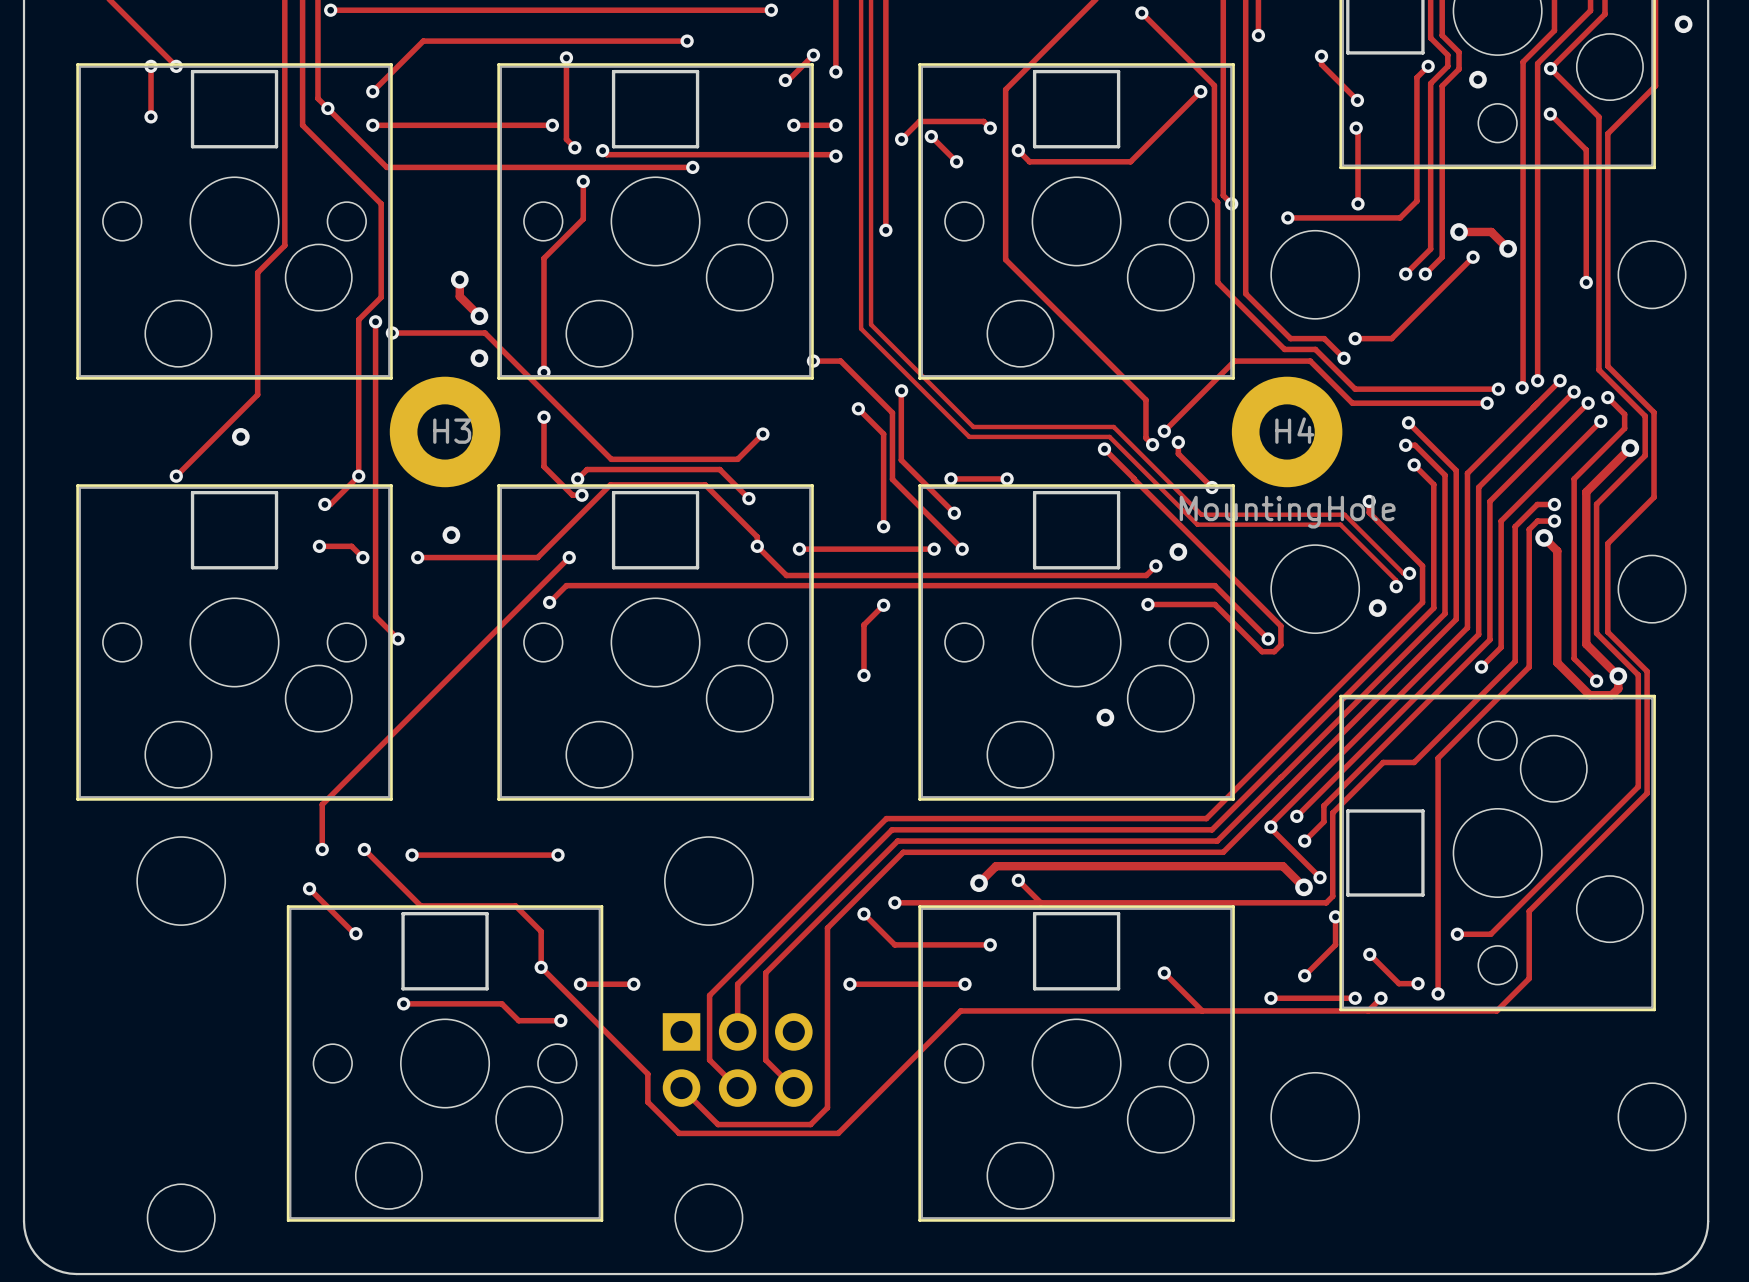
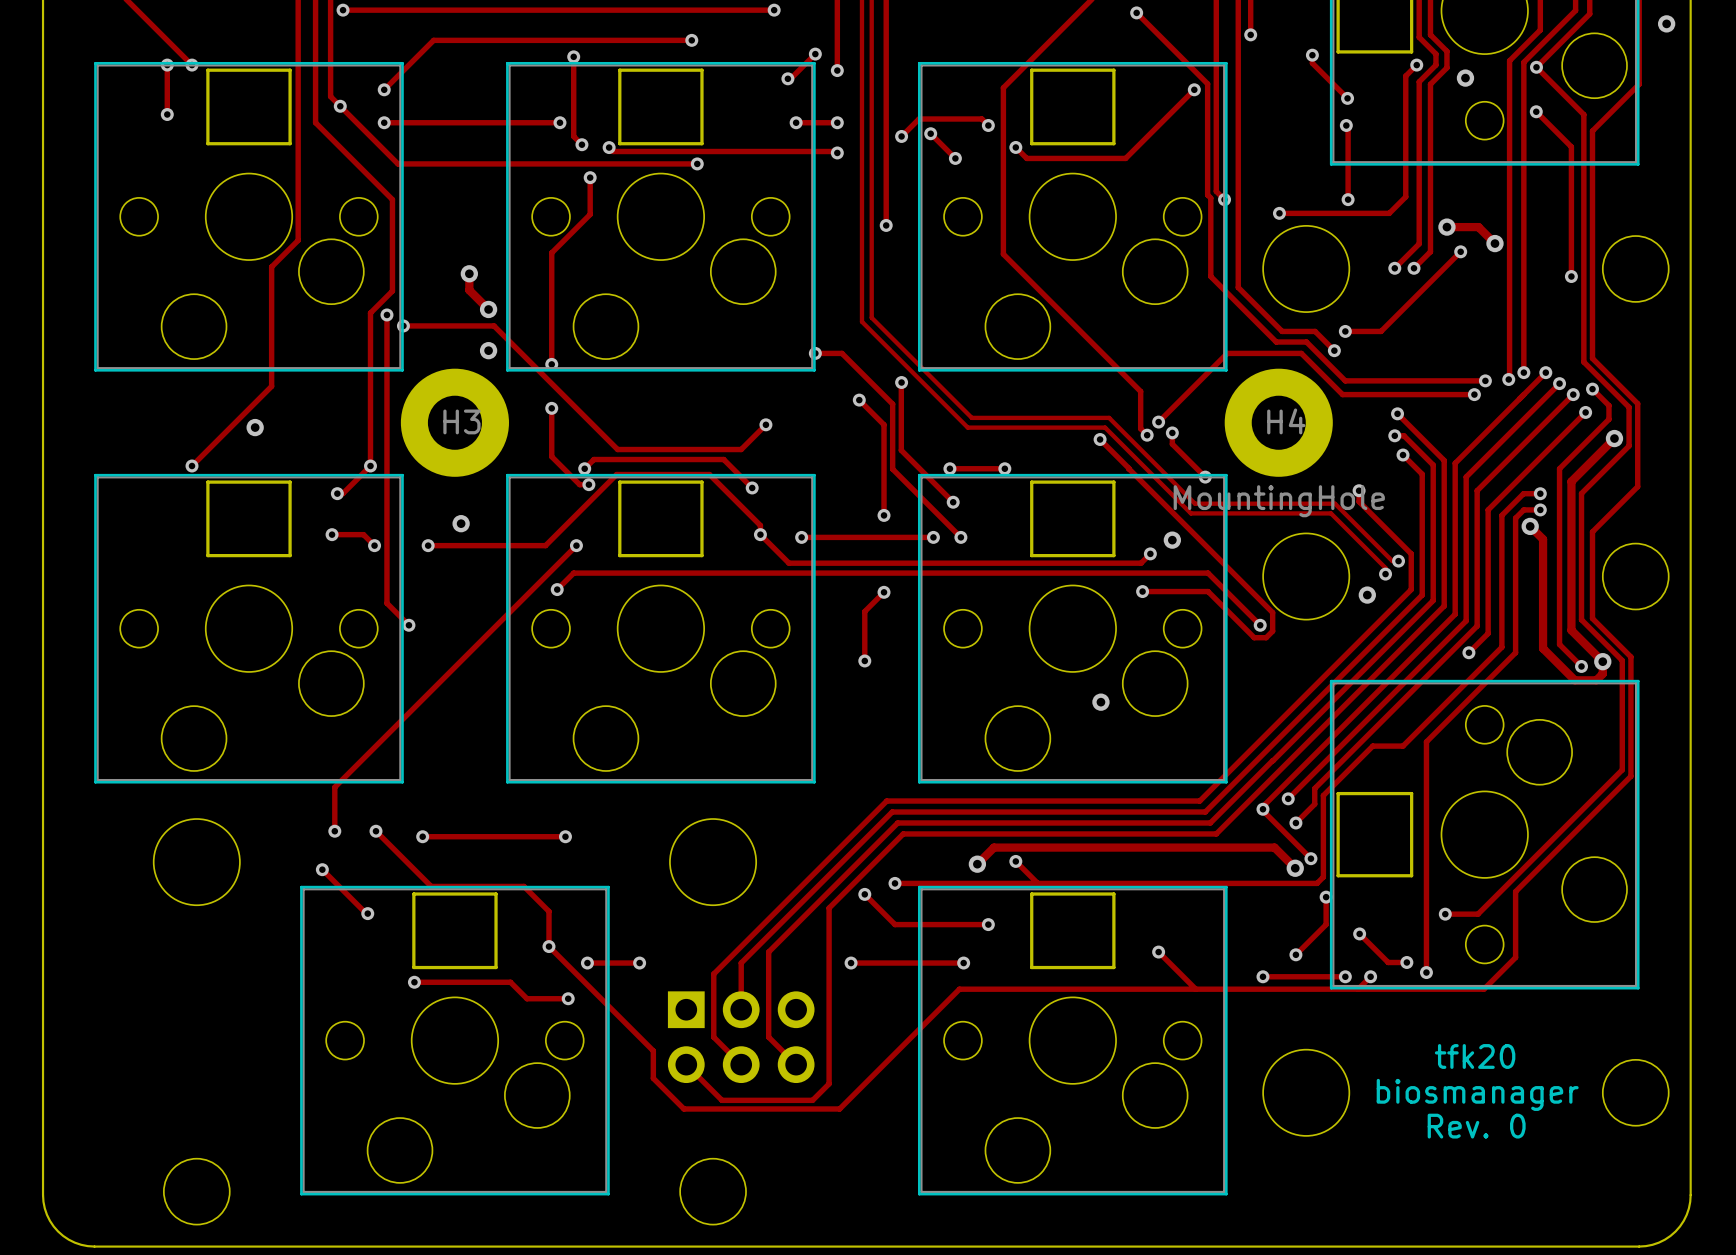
text: none -> tfk20 (1475, 1056)
text: none -> biosmanager (1477, 1094)
text: none -> Rev. 0 (1476, 1126)

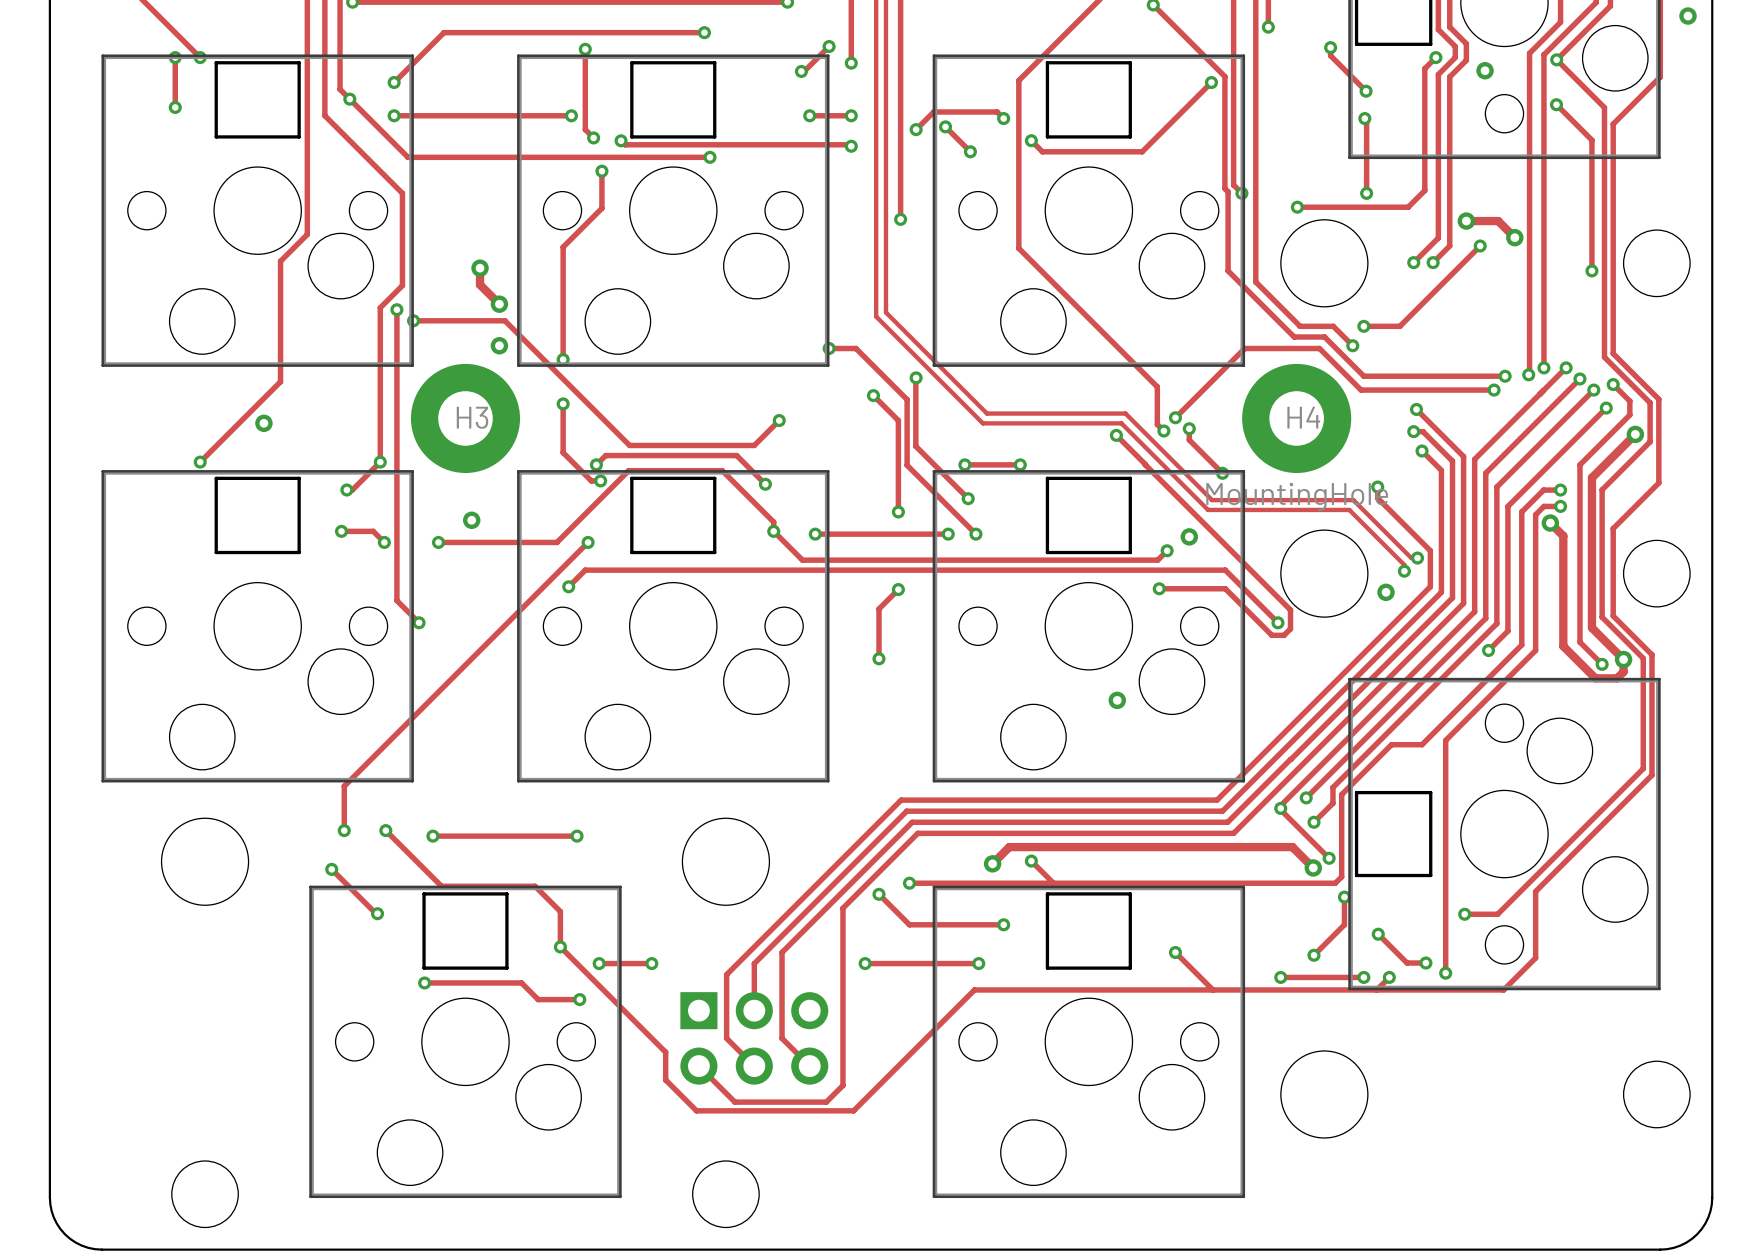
text: tfk20 (1475, 1056) -> none
text: biosmanager (1477, 1094) -> none
text: Rev. 0 (1476, 1126) -> none

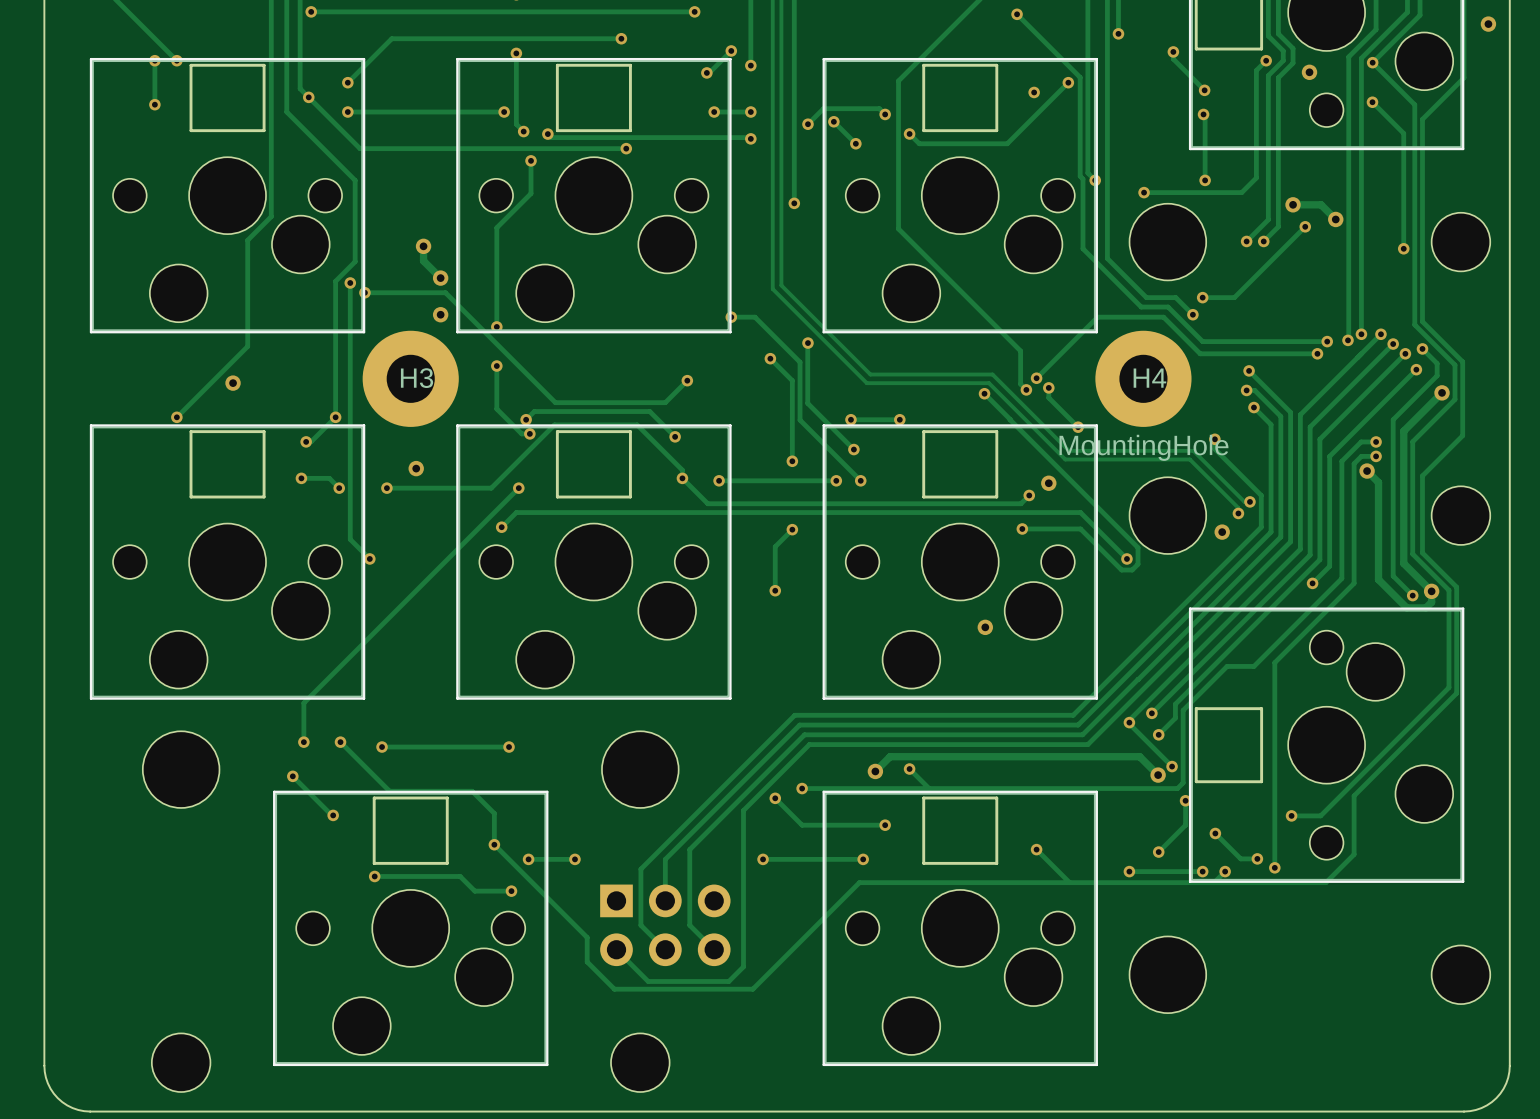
via: none -> (1034, 92)

